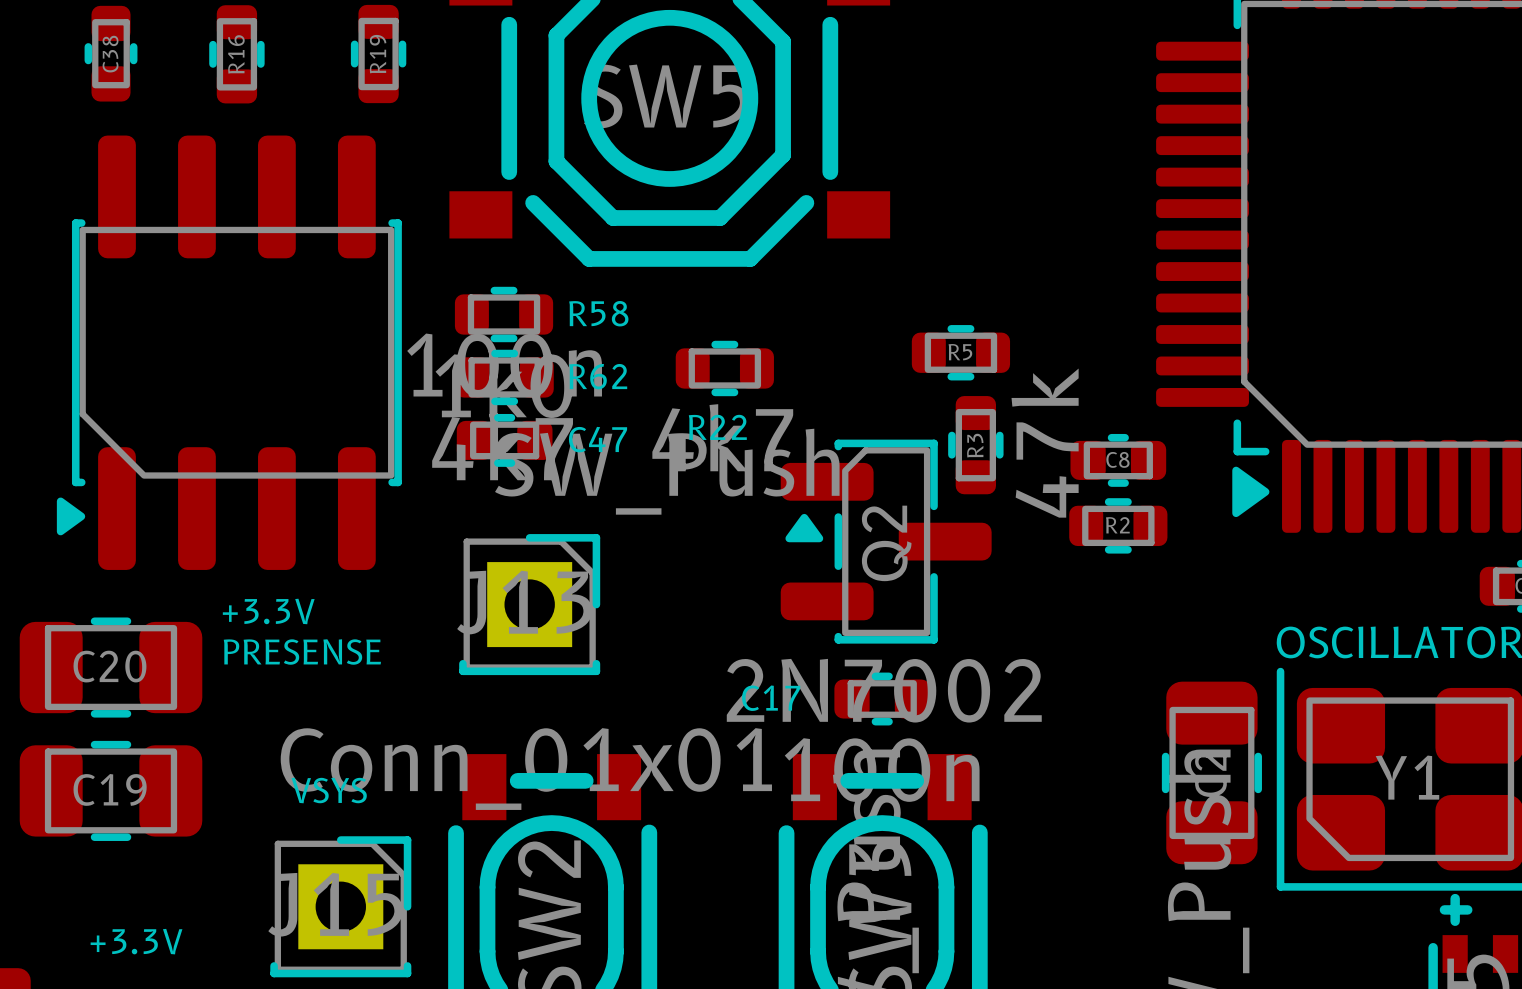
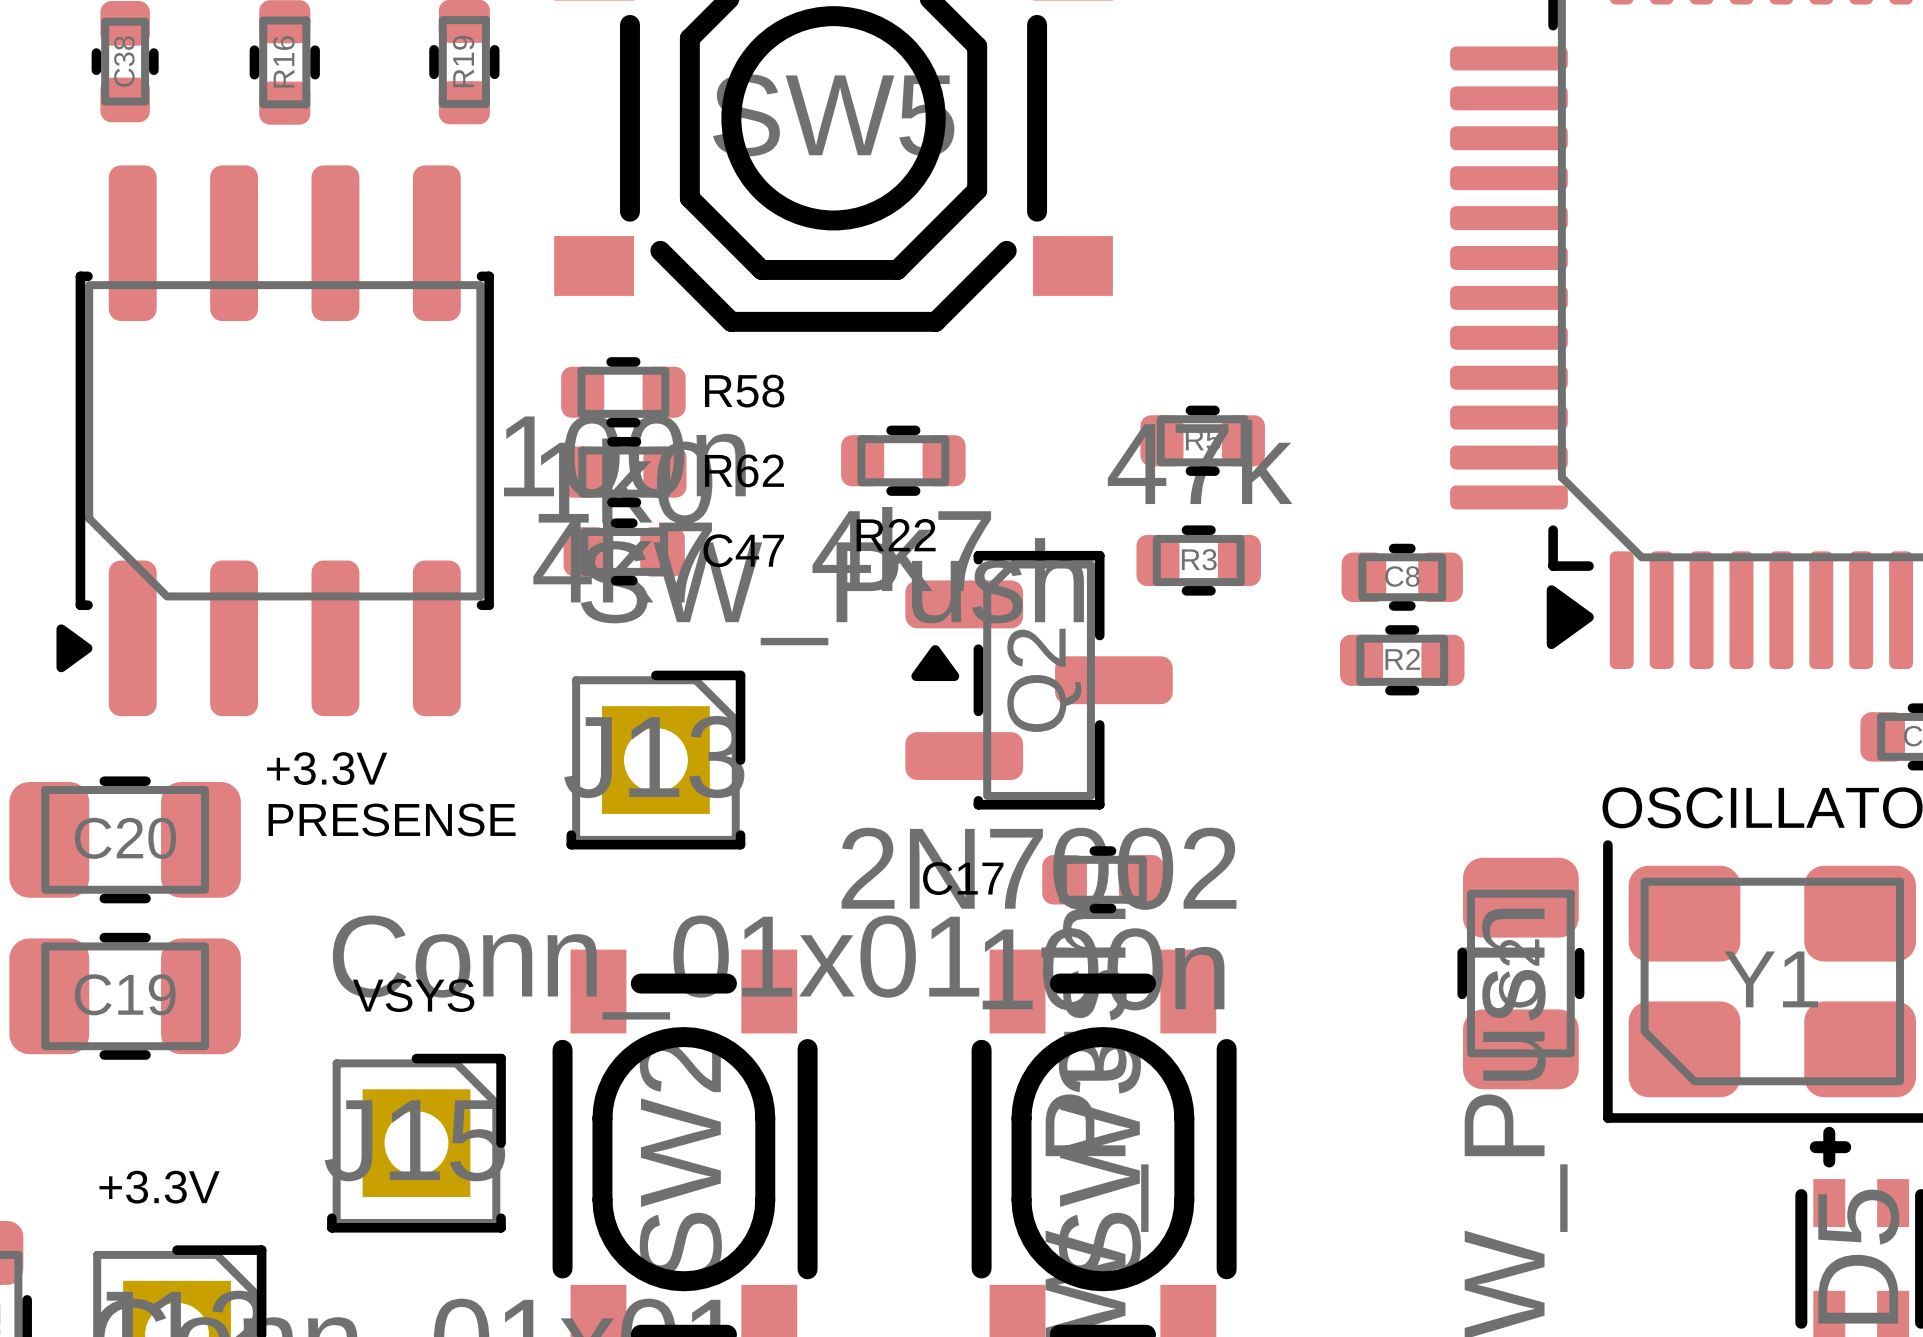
R3 rotation: 0° (975, 445) -> 90° clockwise (1198, 560)
Q2 position: (886, 541) -> (1039, 680)

